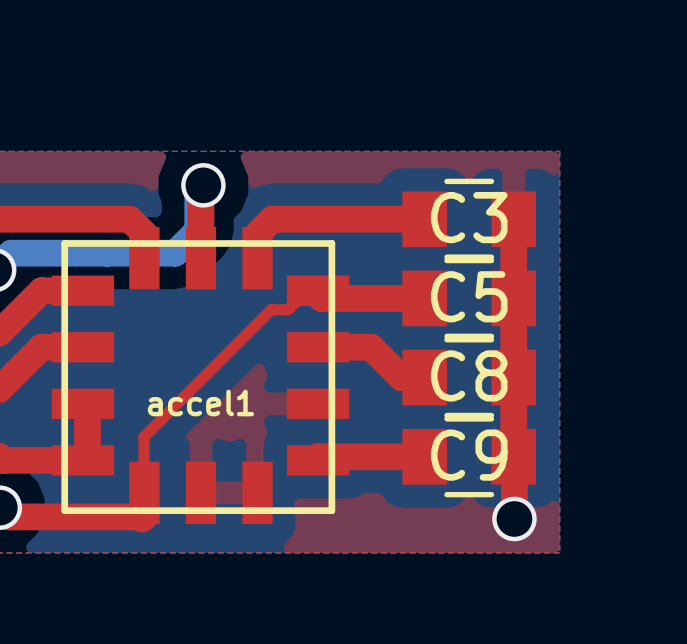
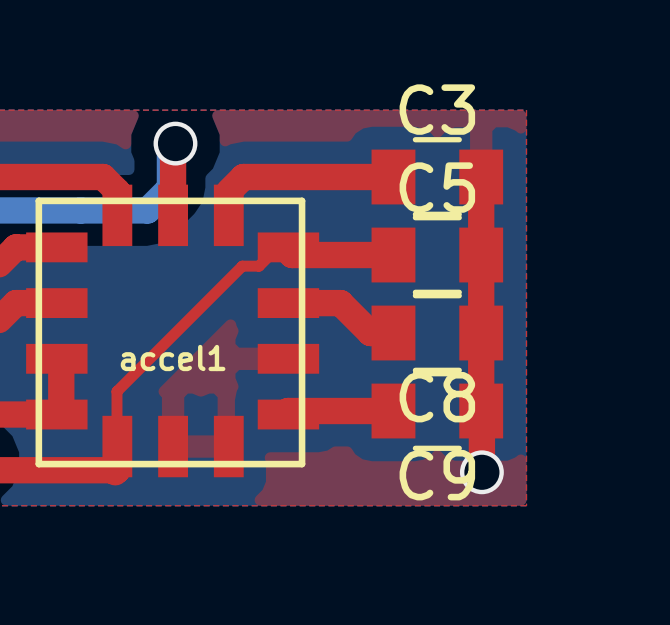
C3 name position: C3 (469, 217) -> C3 (437, 109)
C5 name position: C5 (469, 296) -> C5 (437, 187)
C8 name position: C8 (469, 375) -> C8 (437, 397)
C9 name position: C9 (469, 455) -> C9 (437, 475)

